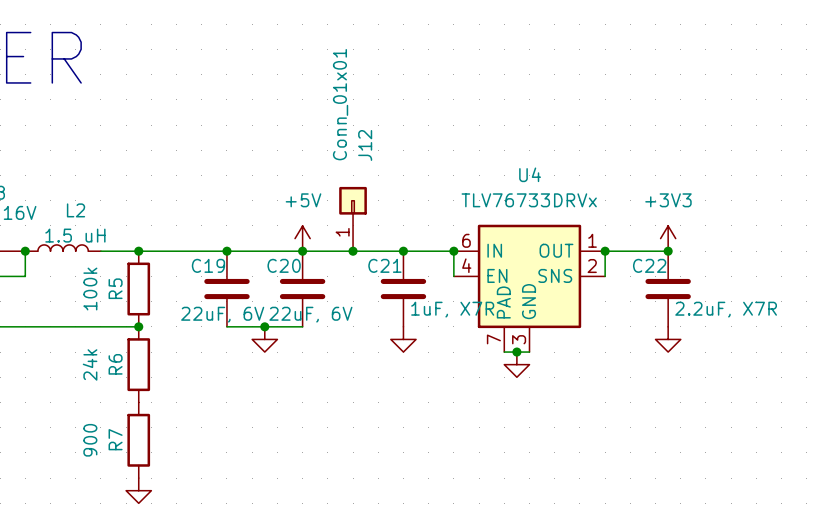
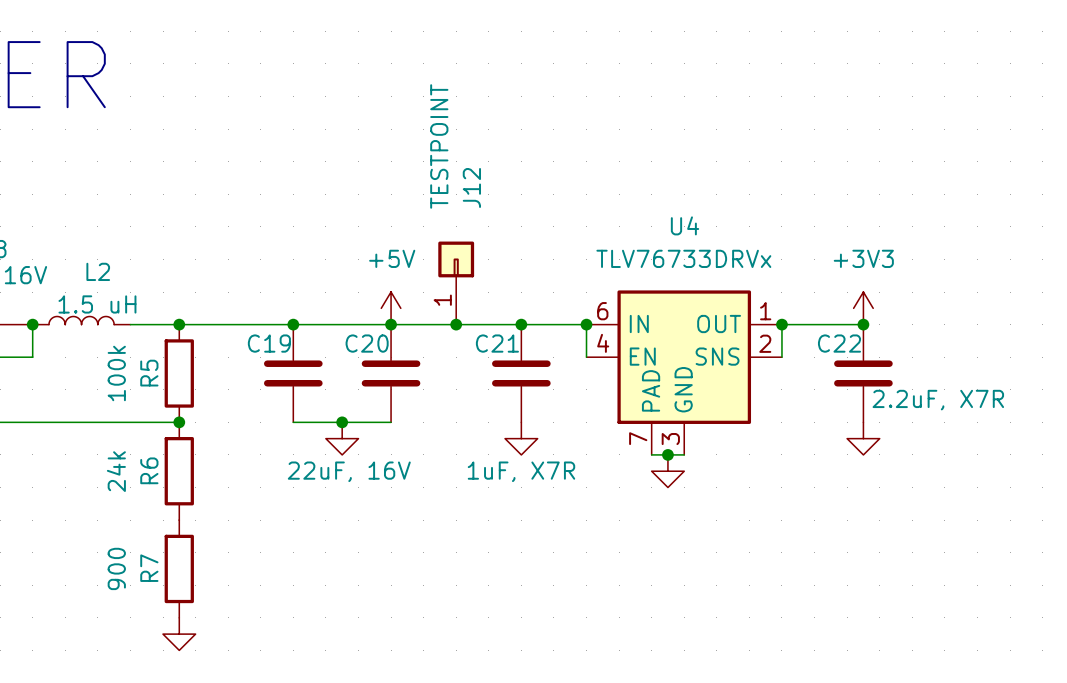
J12 value: Conn_01x01 (340, 104) -> TESTPOINT (439, 146)
C21 value position: 1uF, X7R (452, 309) -> 1uF, X7R (521, 471)
C19 value: 22uF, 6V (222, 314) -> none
C20 value: 22uF, 6V (310, 314) -> 22uF, 16V (349, 471)

